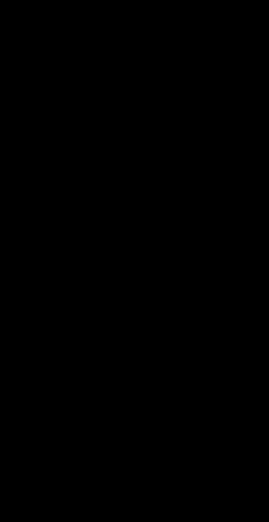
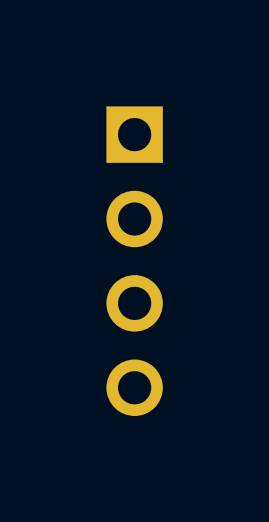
part: none -> (134, 261)

